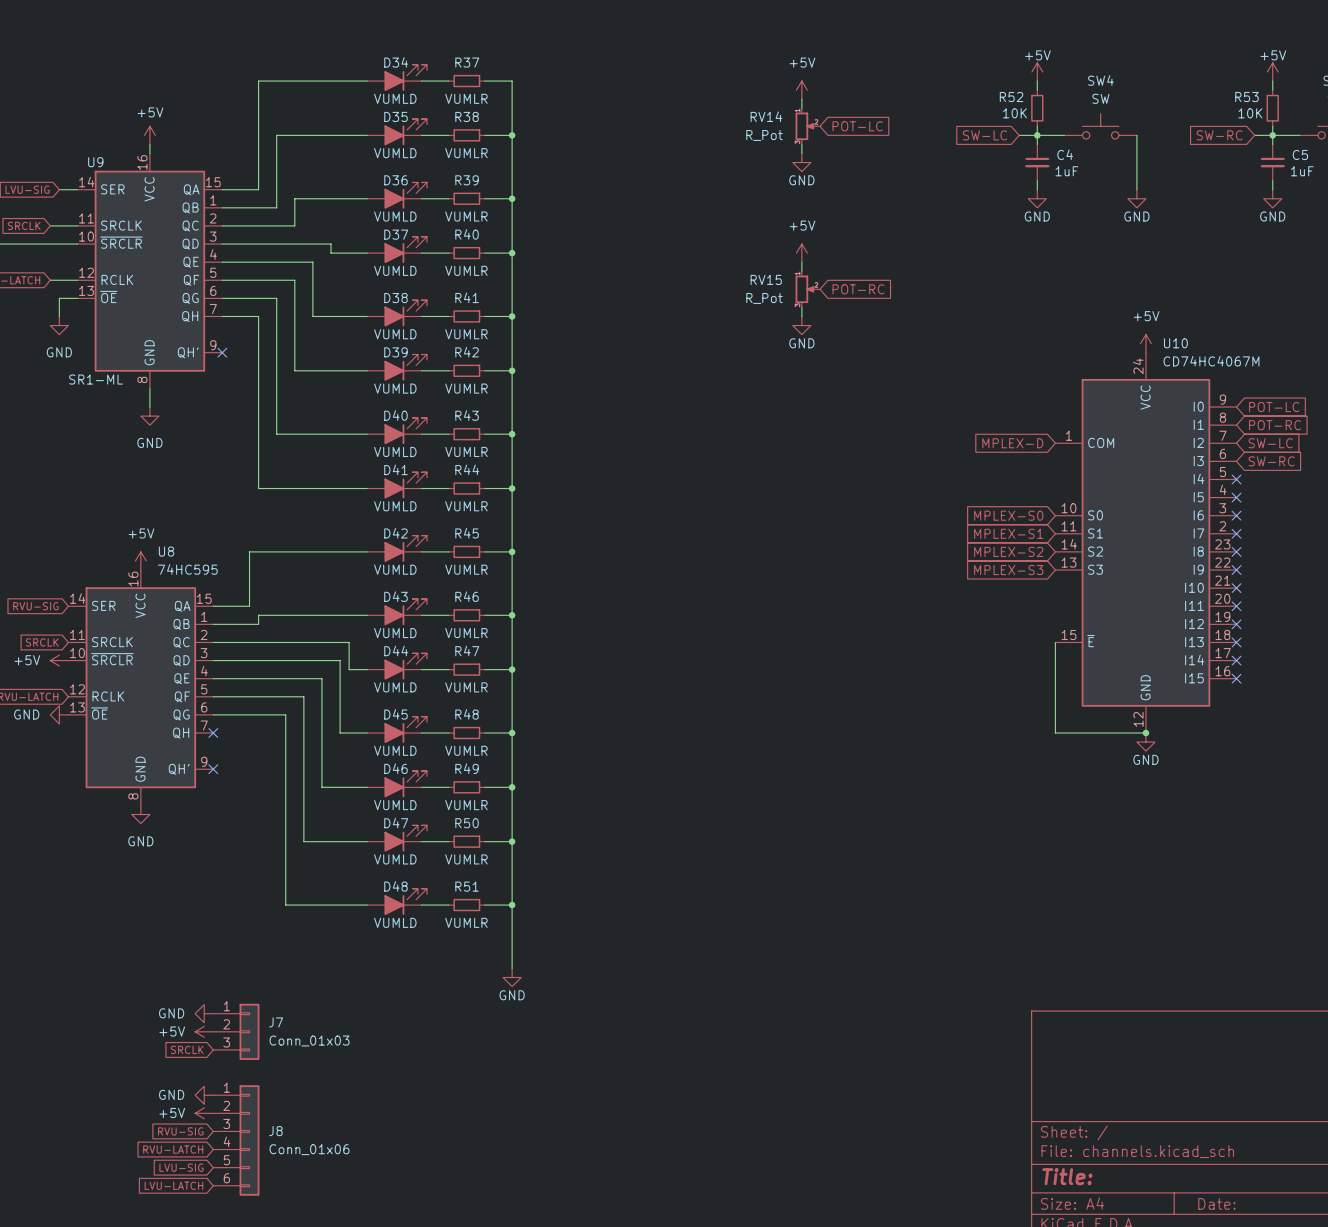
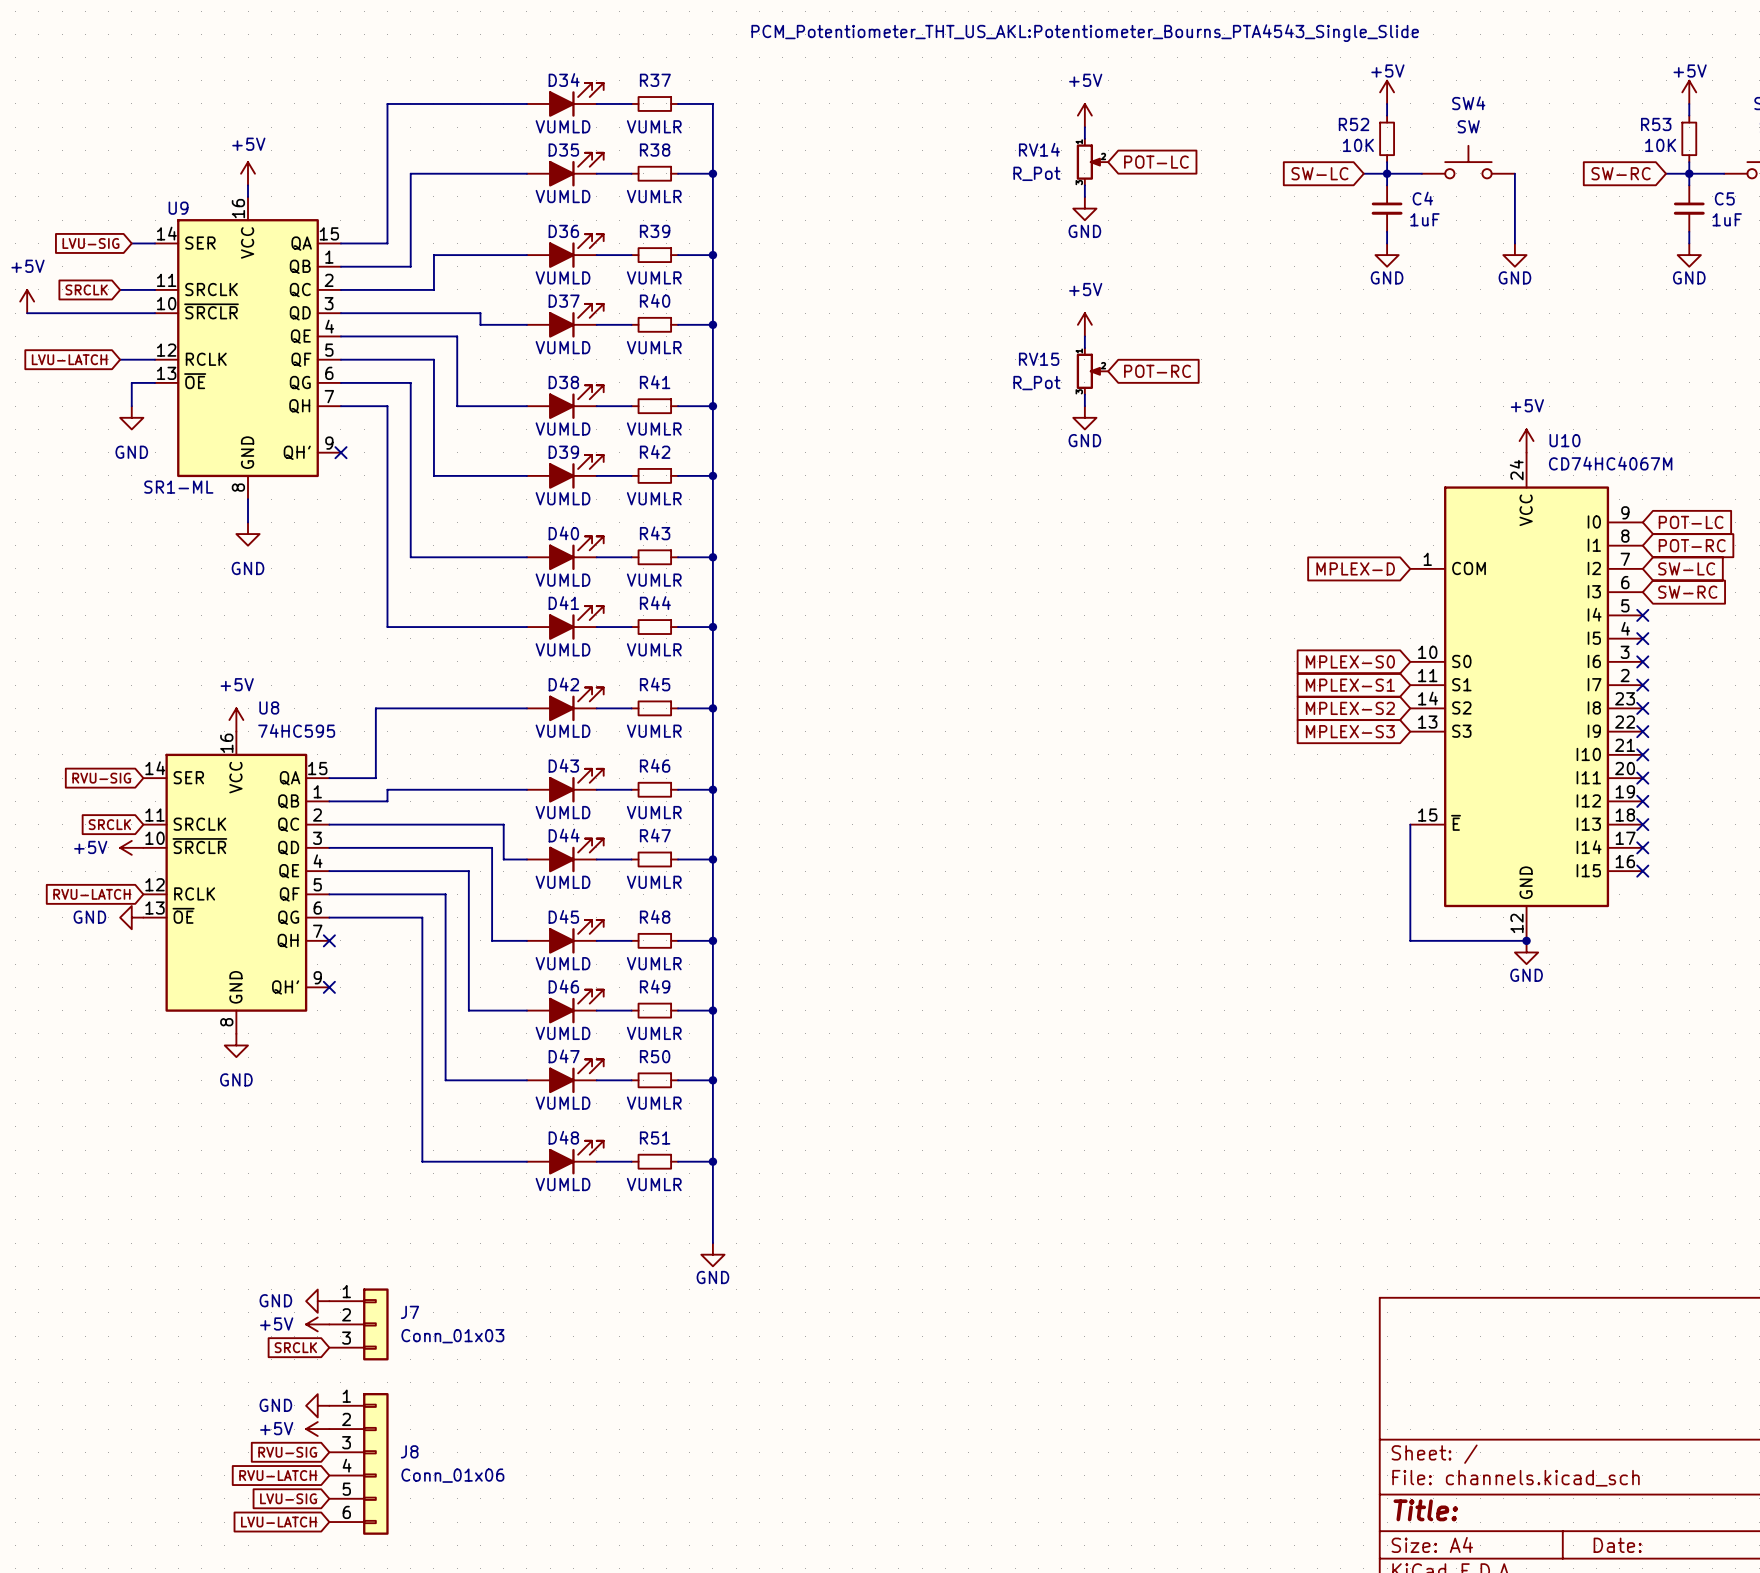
RV14 text: none -> PCM_Potentiometer_THT_US_AKL:Potentiometer_Bourns_PTA4543_Single_Slide (1085, 33)

